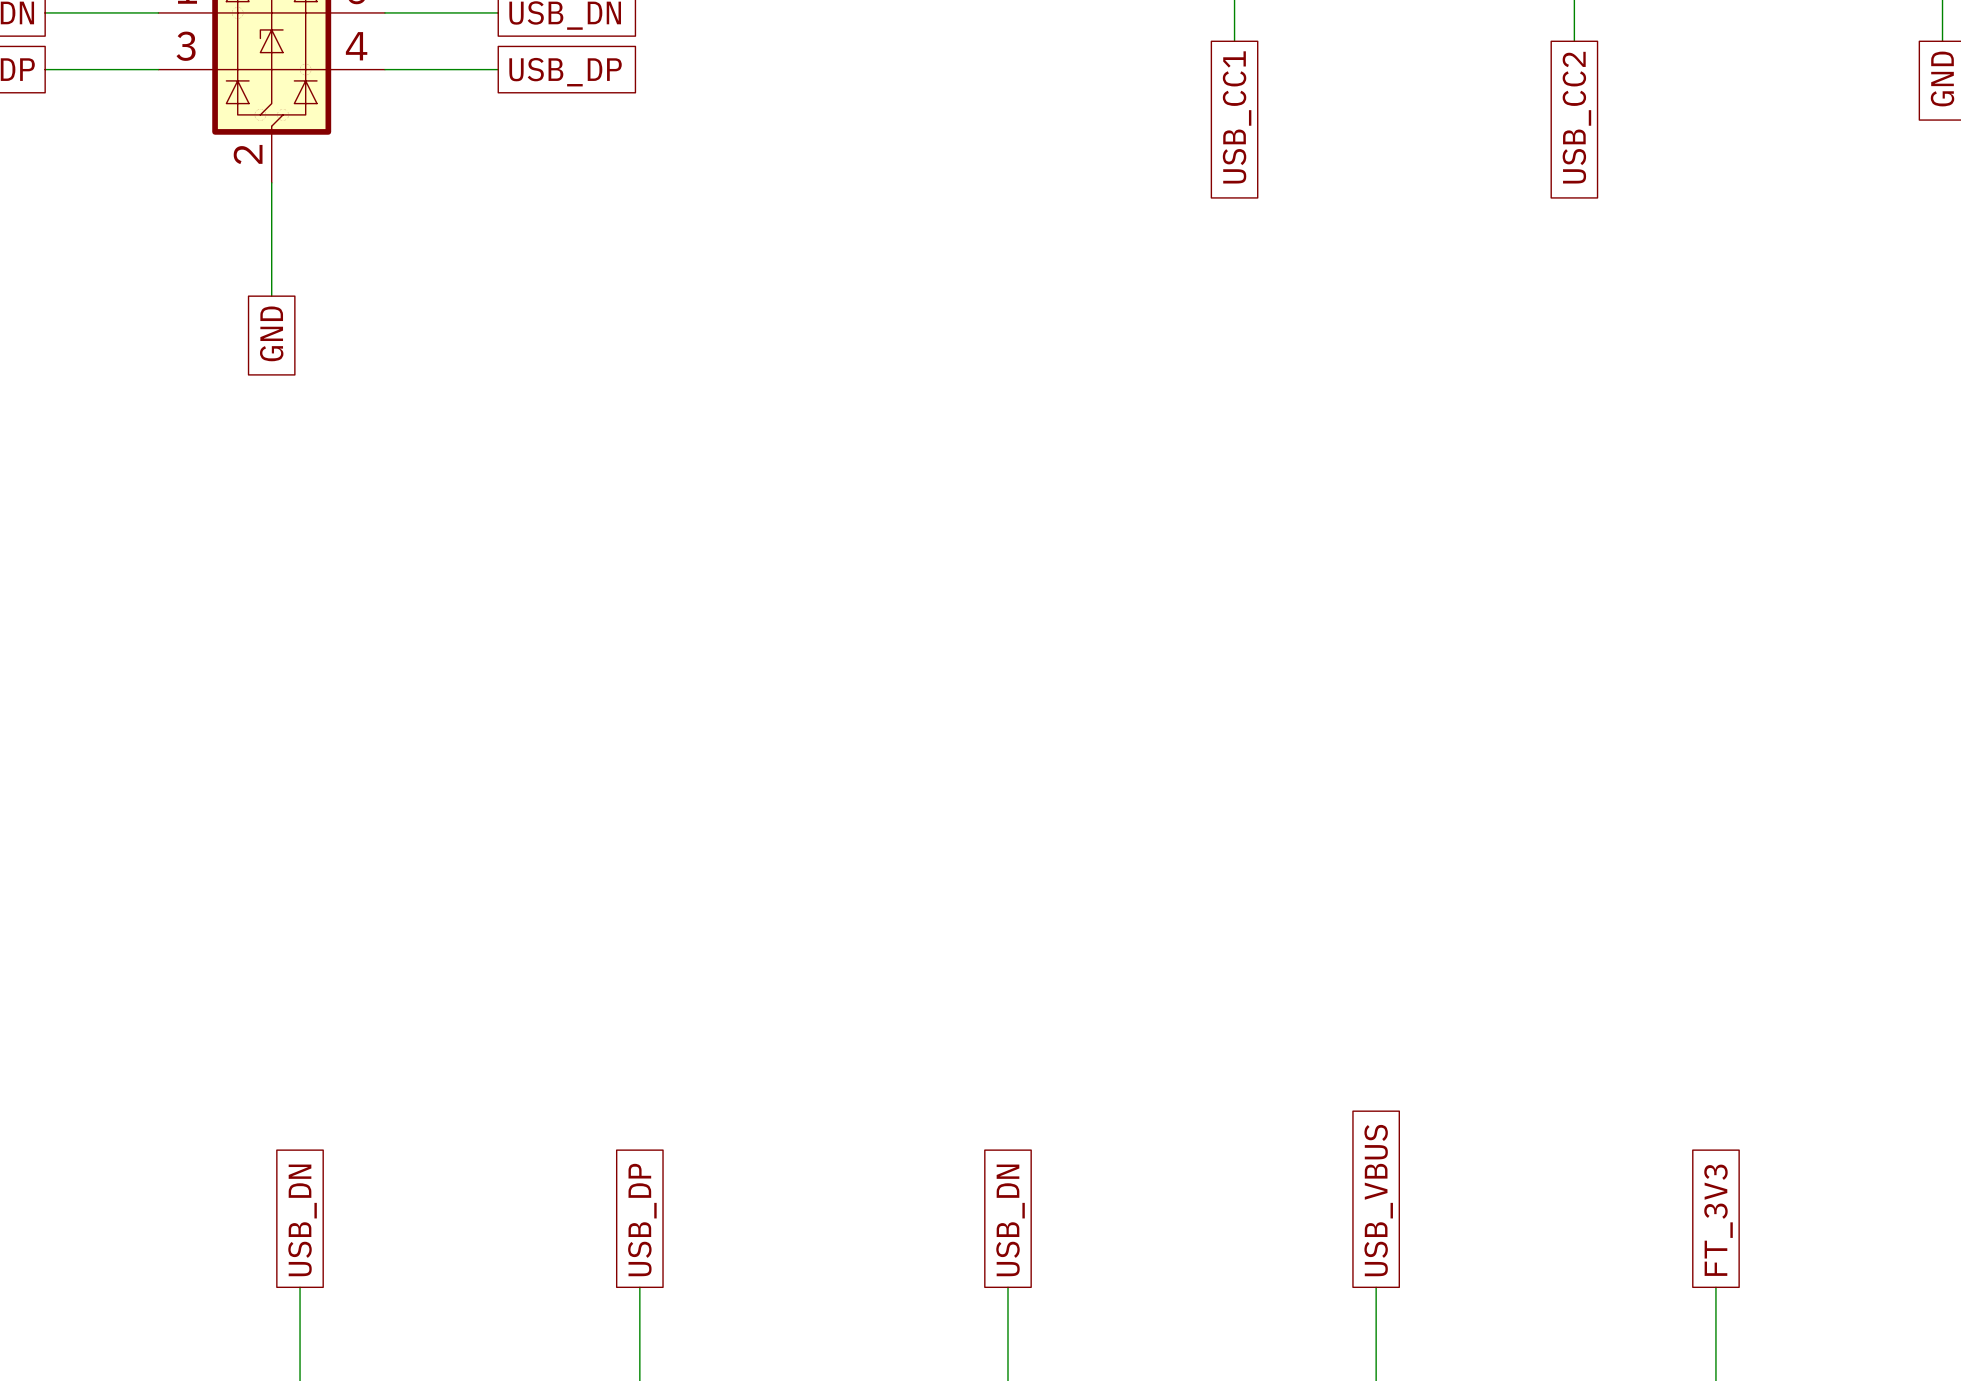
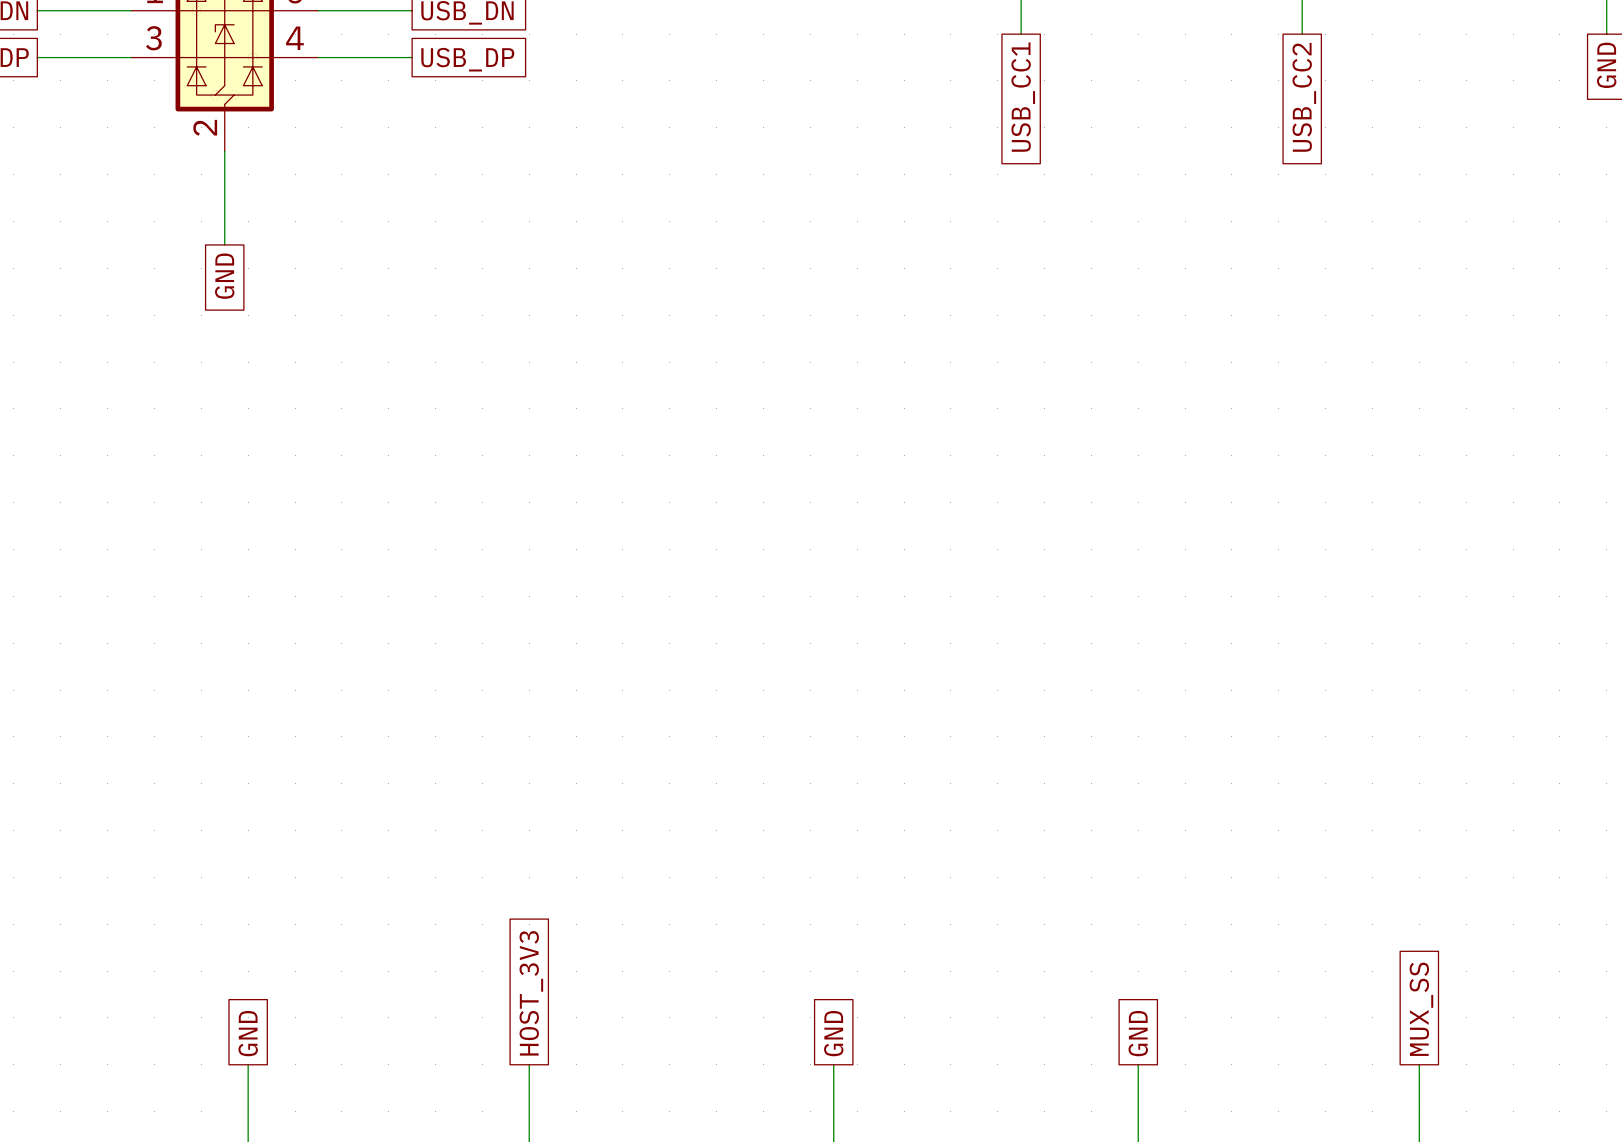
global label: USB_VBUS (1378, 1200) -> GND (1138, 1033)
global label: USB_DN (302, 1220) -> GND (248, 1033)
global label: USB_DP (642, 1220) -> HOST_3V3 (531, 993)
global label: USB_DN (1010, 1220) -> GND (833, 1033)
global label: FT_3V3 (1718, 1220) -> MUX_SS (1421, 1009)

